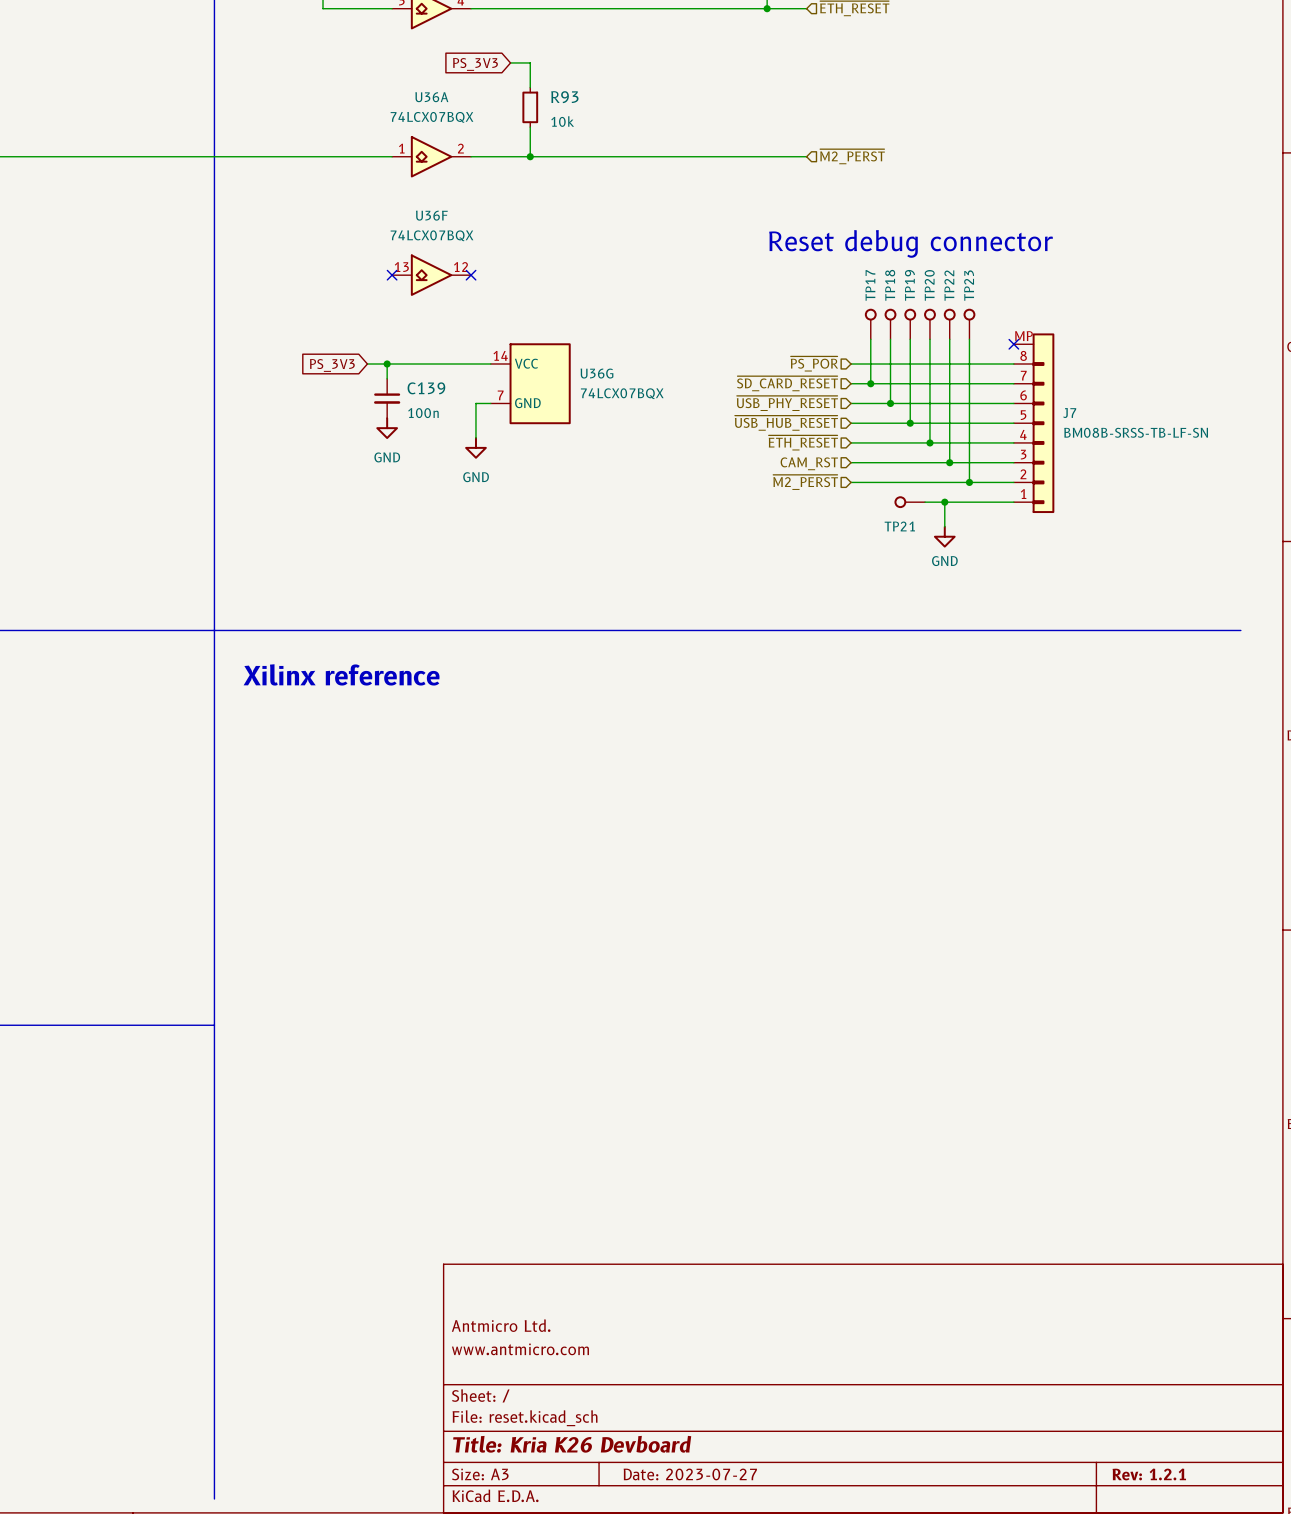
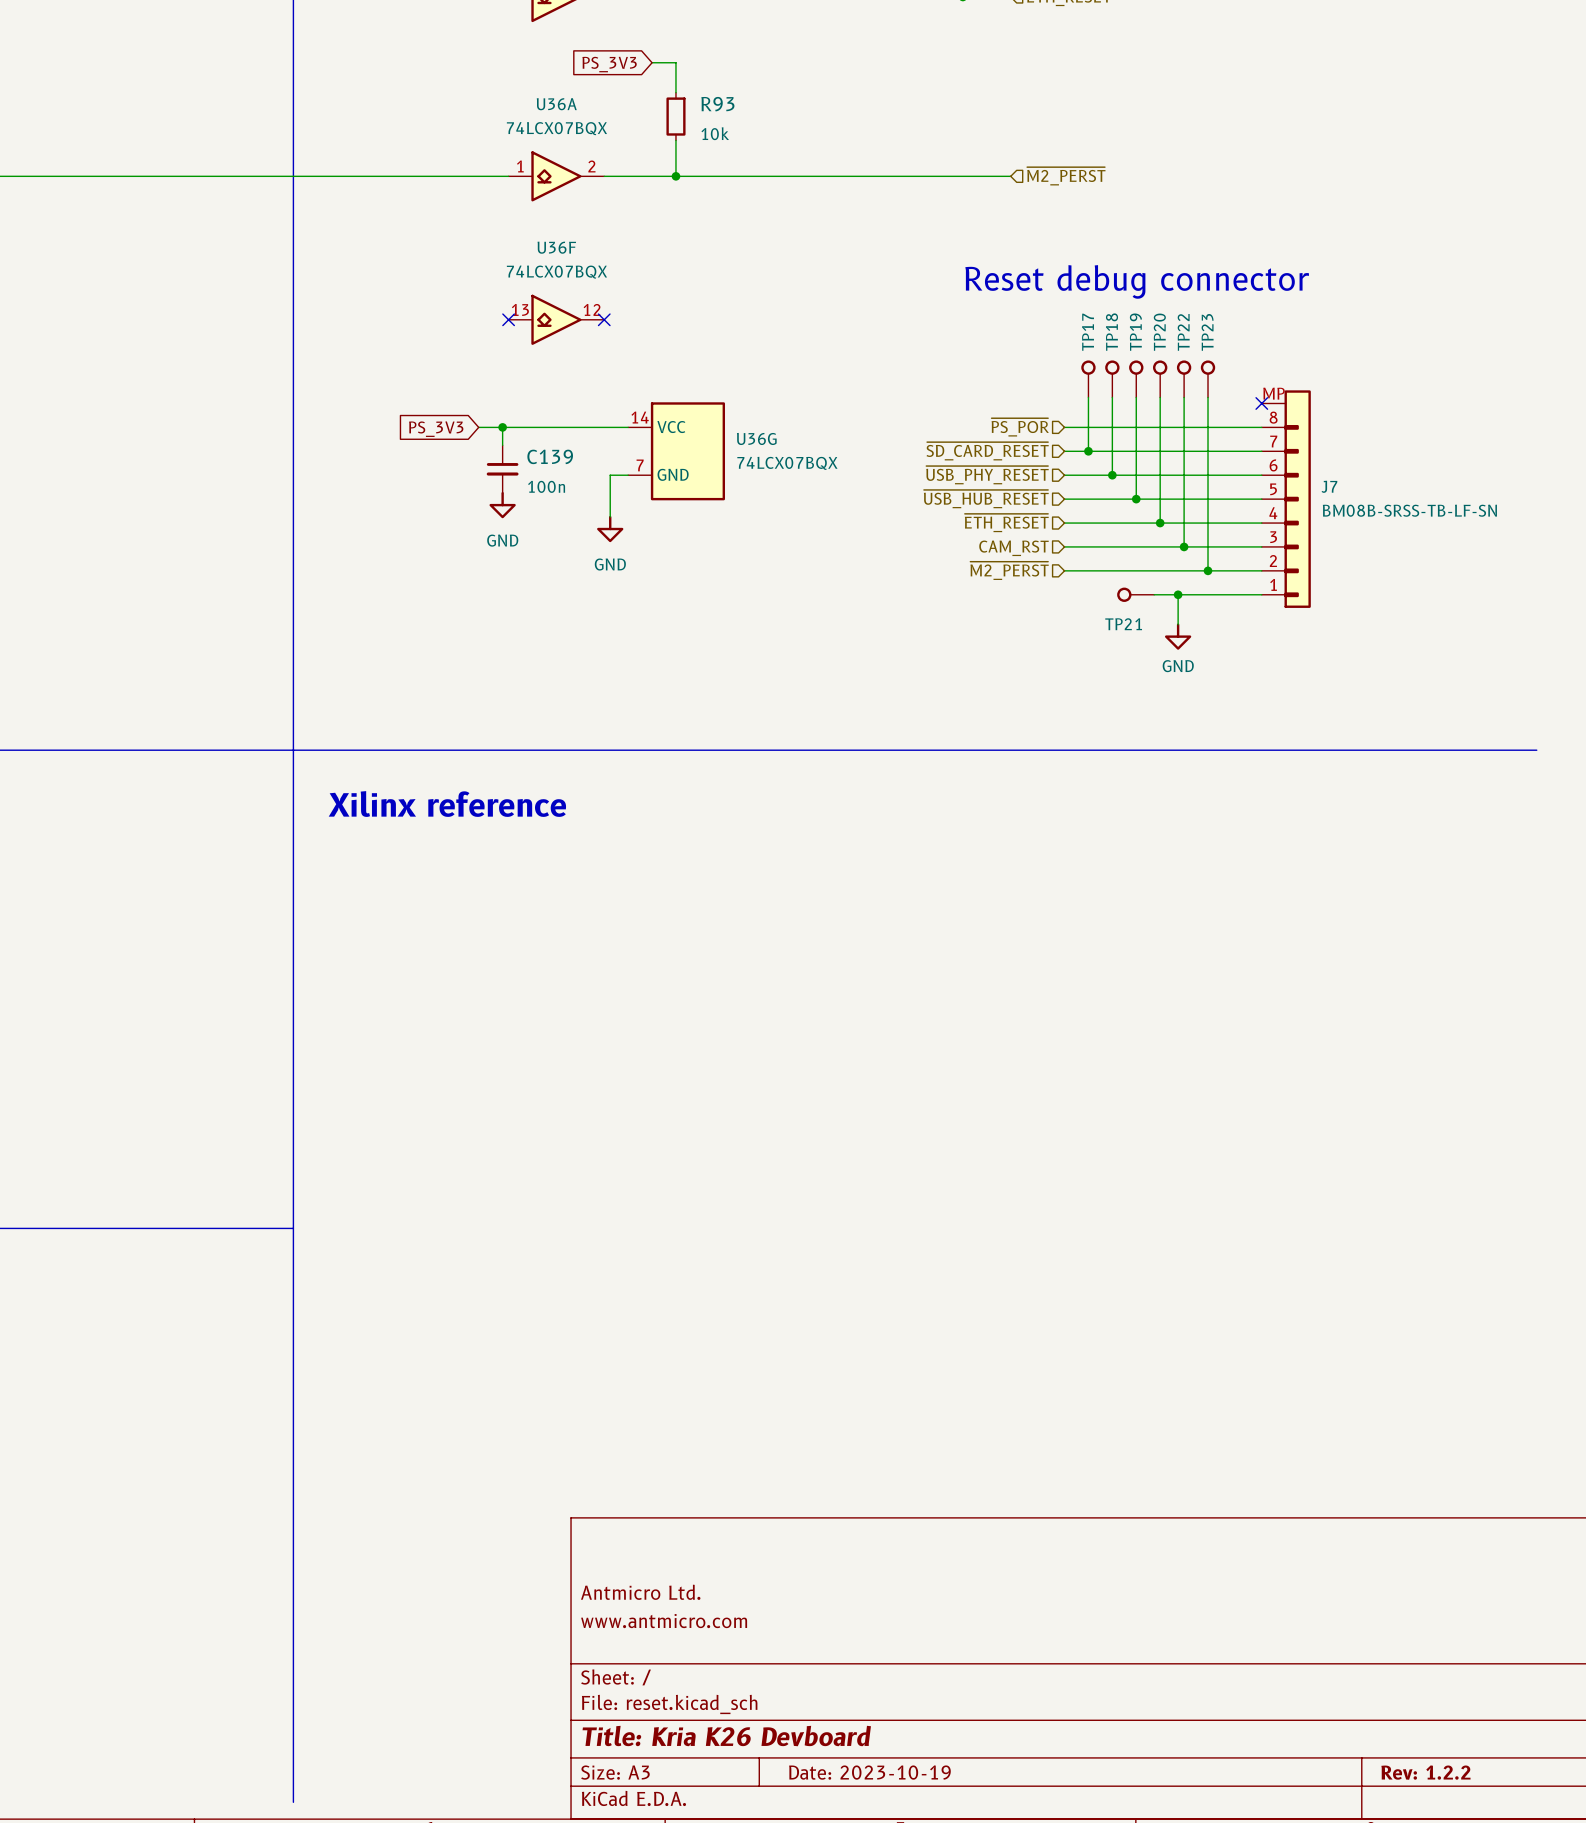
title block: Date: 2023-07-27 (690, 1474) -> Date: 2023-10-19 (869, 1772)
title block: Rev: 1.2.1 (1149, 1474) -> Rev: 1.2.2 (1425, 1772)

